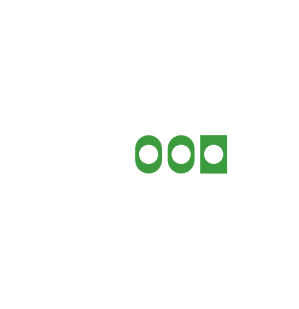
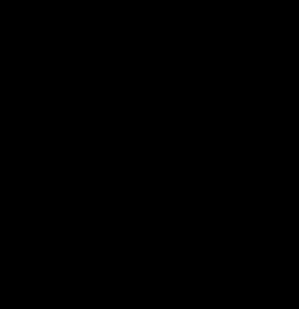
part: (181, 154) -> none

